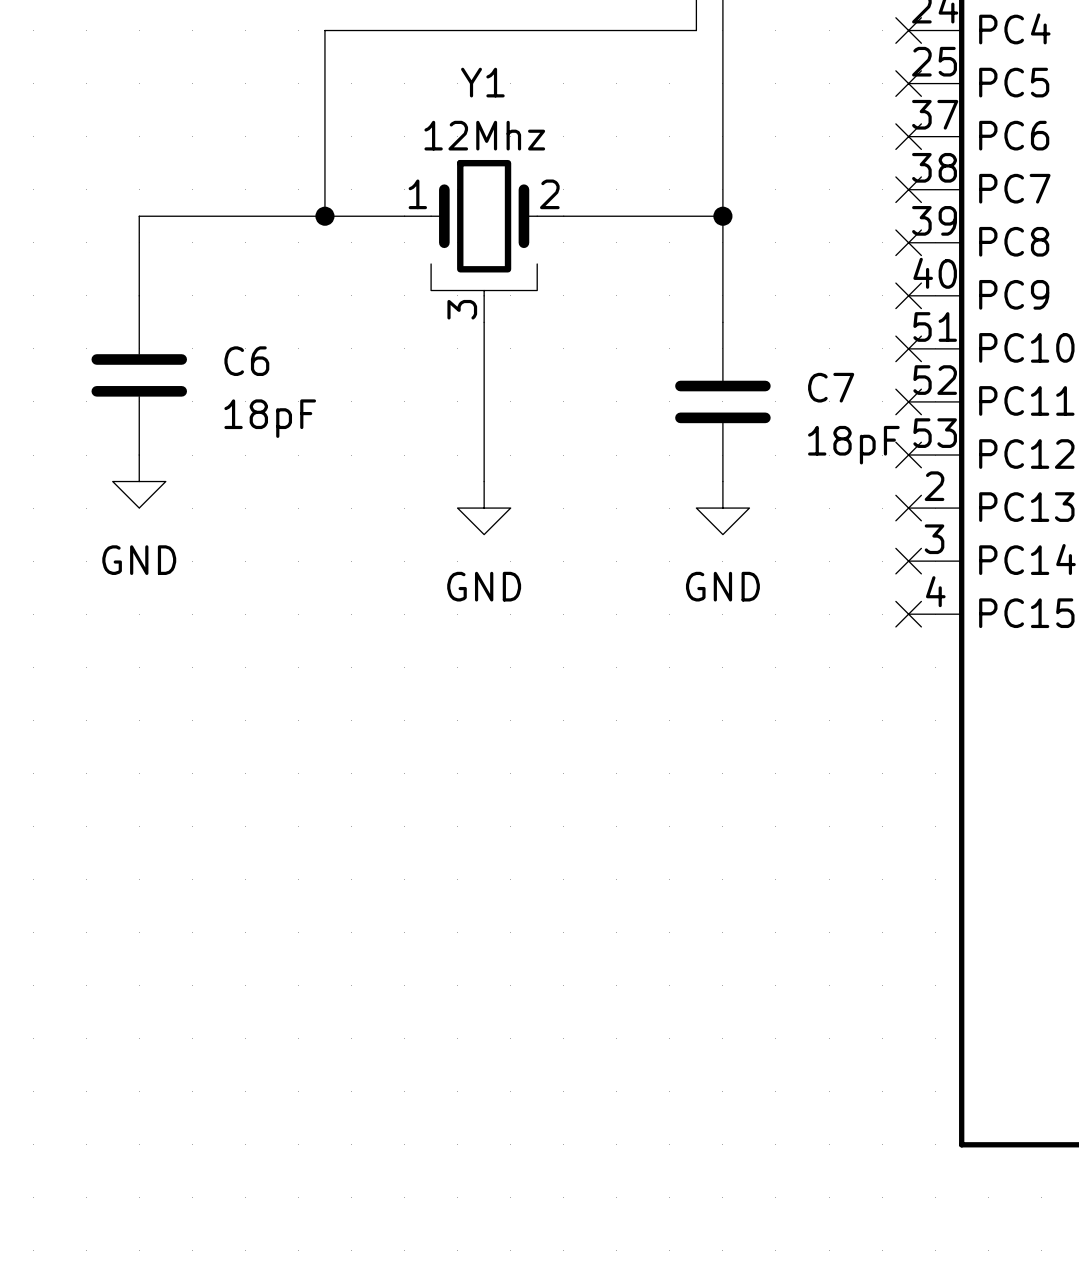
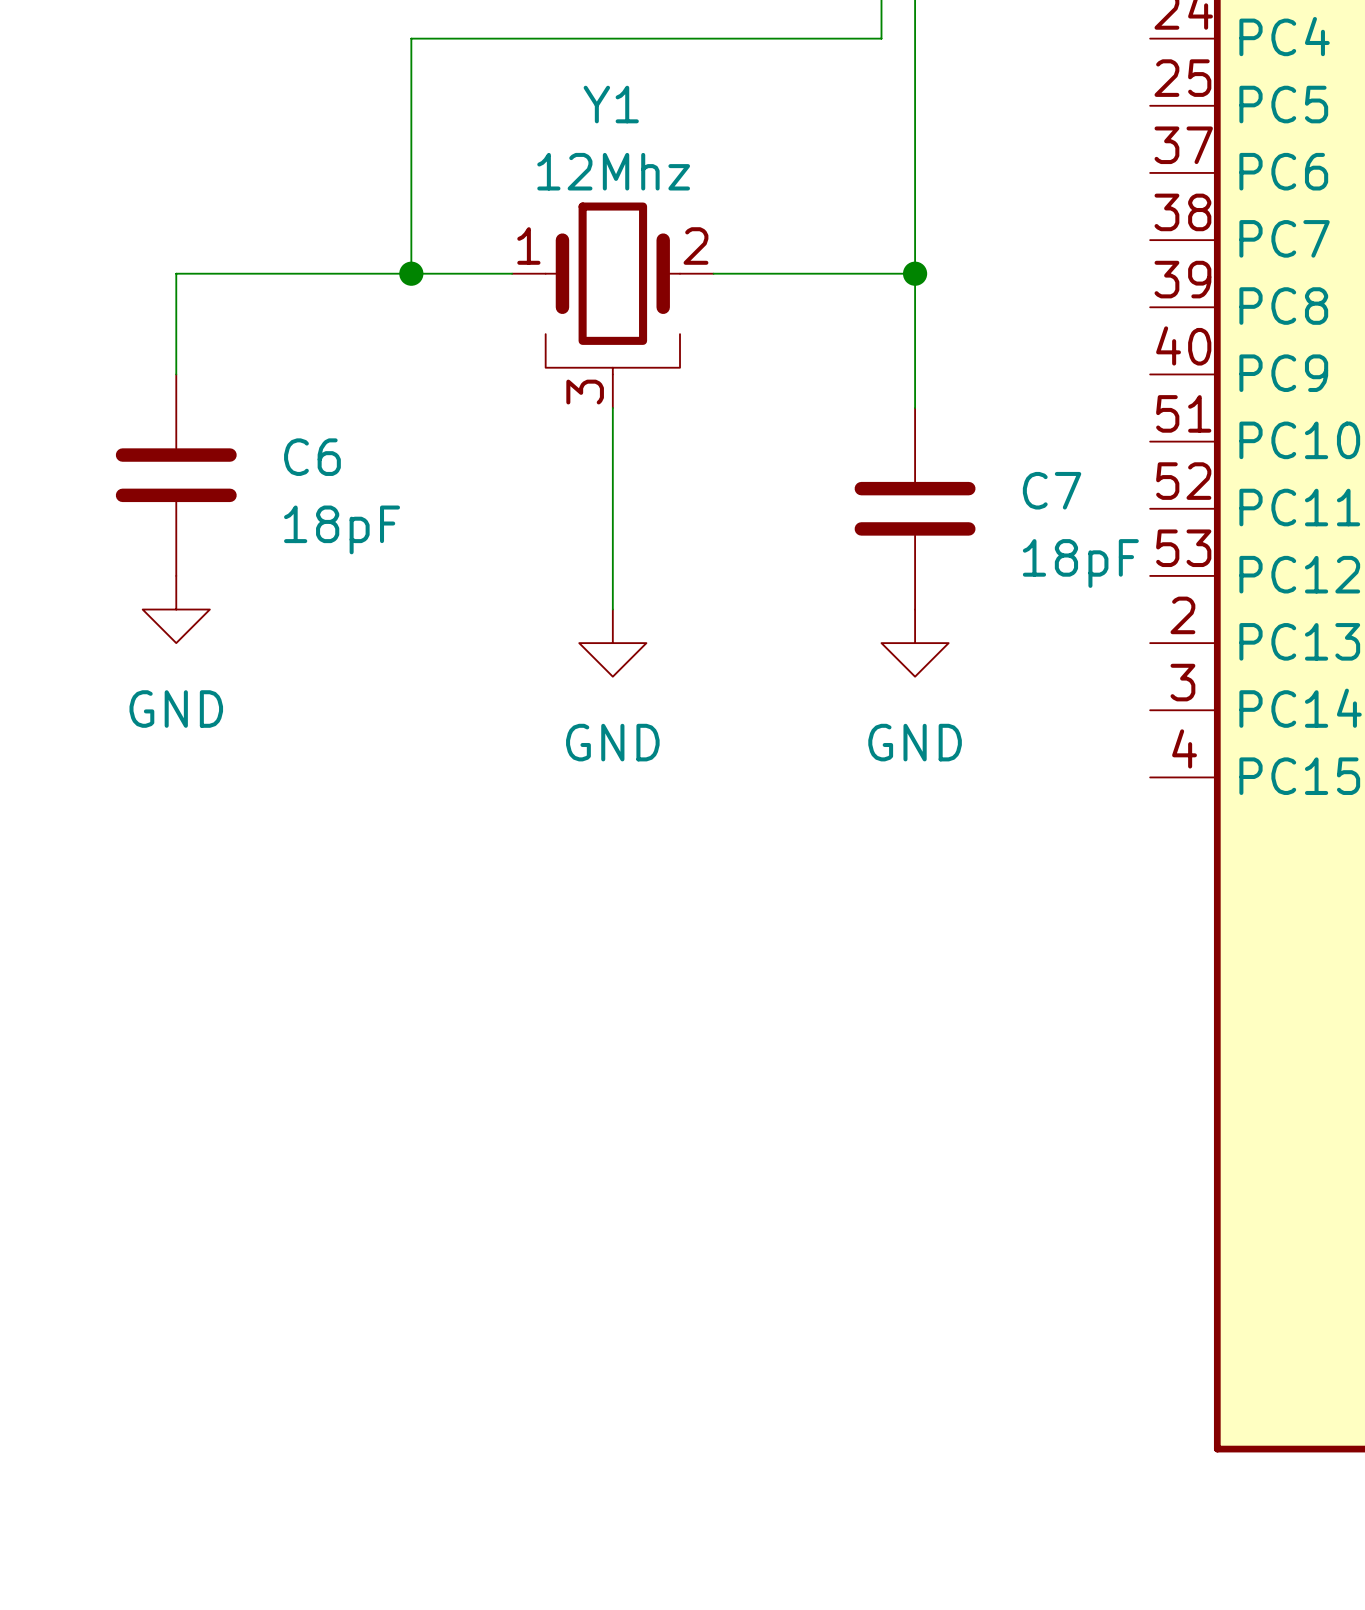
no-connect mark: (908, 30) -> none
no-connect mark: (908, 83) -> none
no-connect mark: (908, 136) -> none
no-connect mark: (908, 189) -> none
no-connect mark: (908, 242) -> none
no-connect mark: (908, 295) -> none
no-connect mark: (908, 348) -> none
no-connect mark: (908, 401) -> none
no-connect mark: (908, 455) -> none
no-connect mark: (908, 508) -> none
no-connect mark: (908, 561) -> none
no-connect mark: (908, 614) -> none

